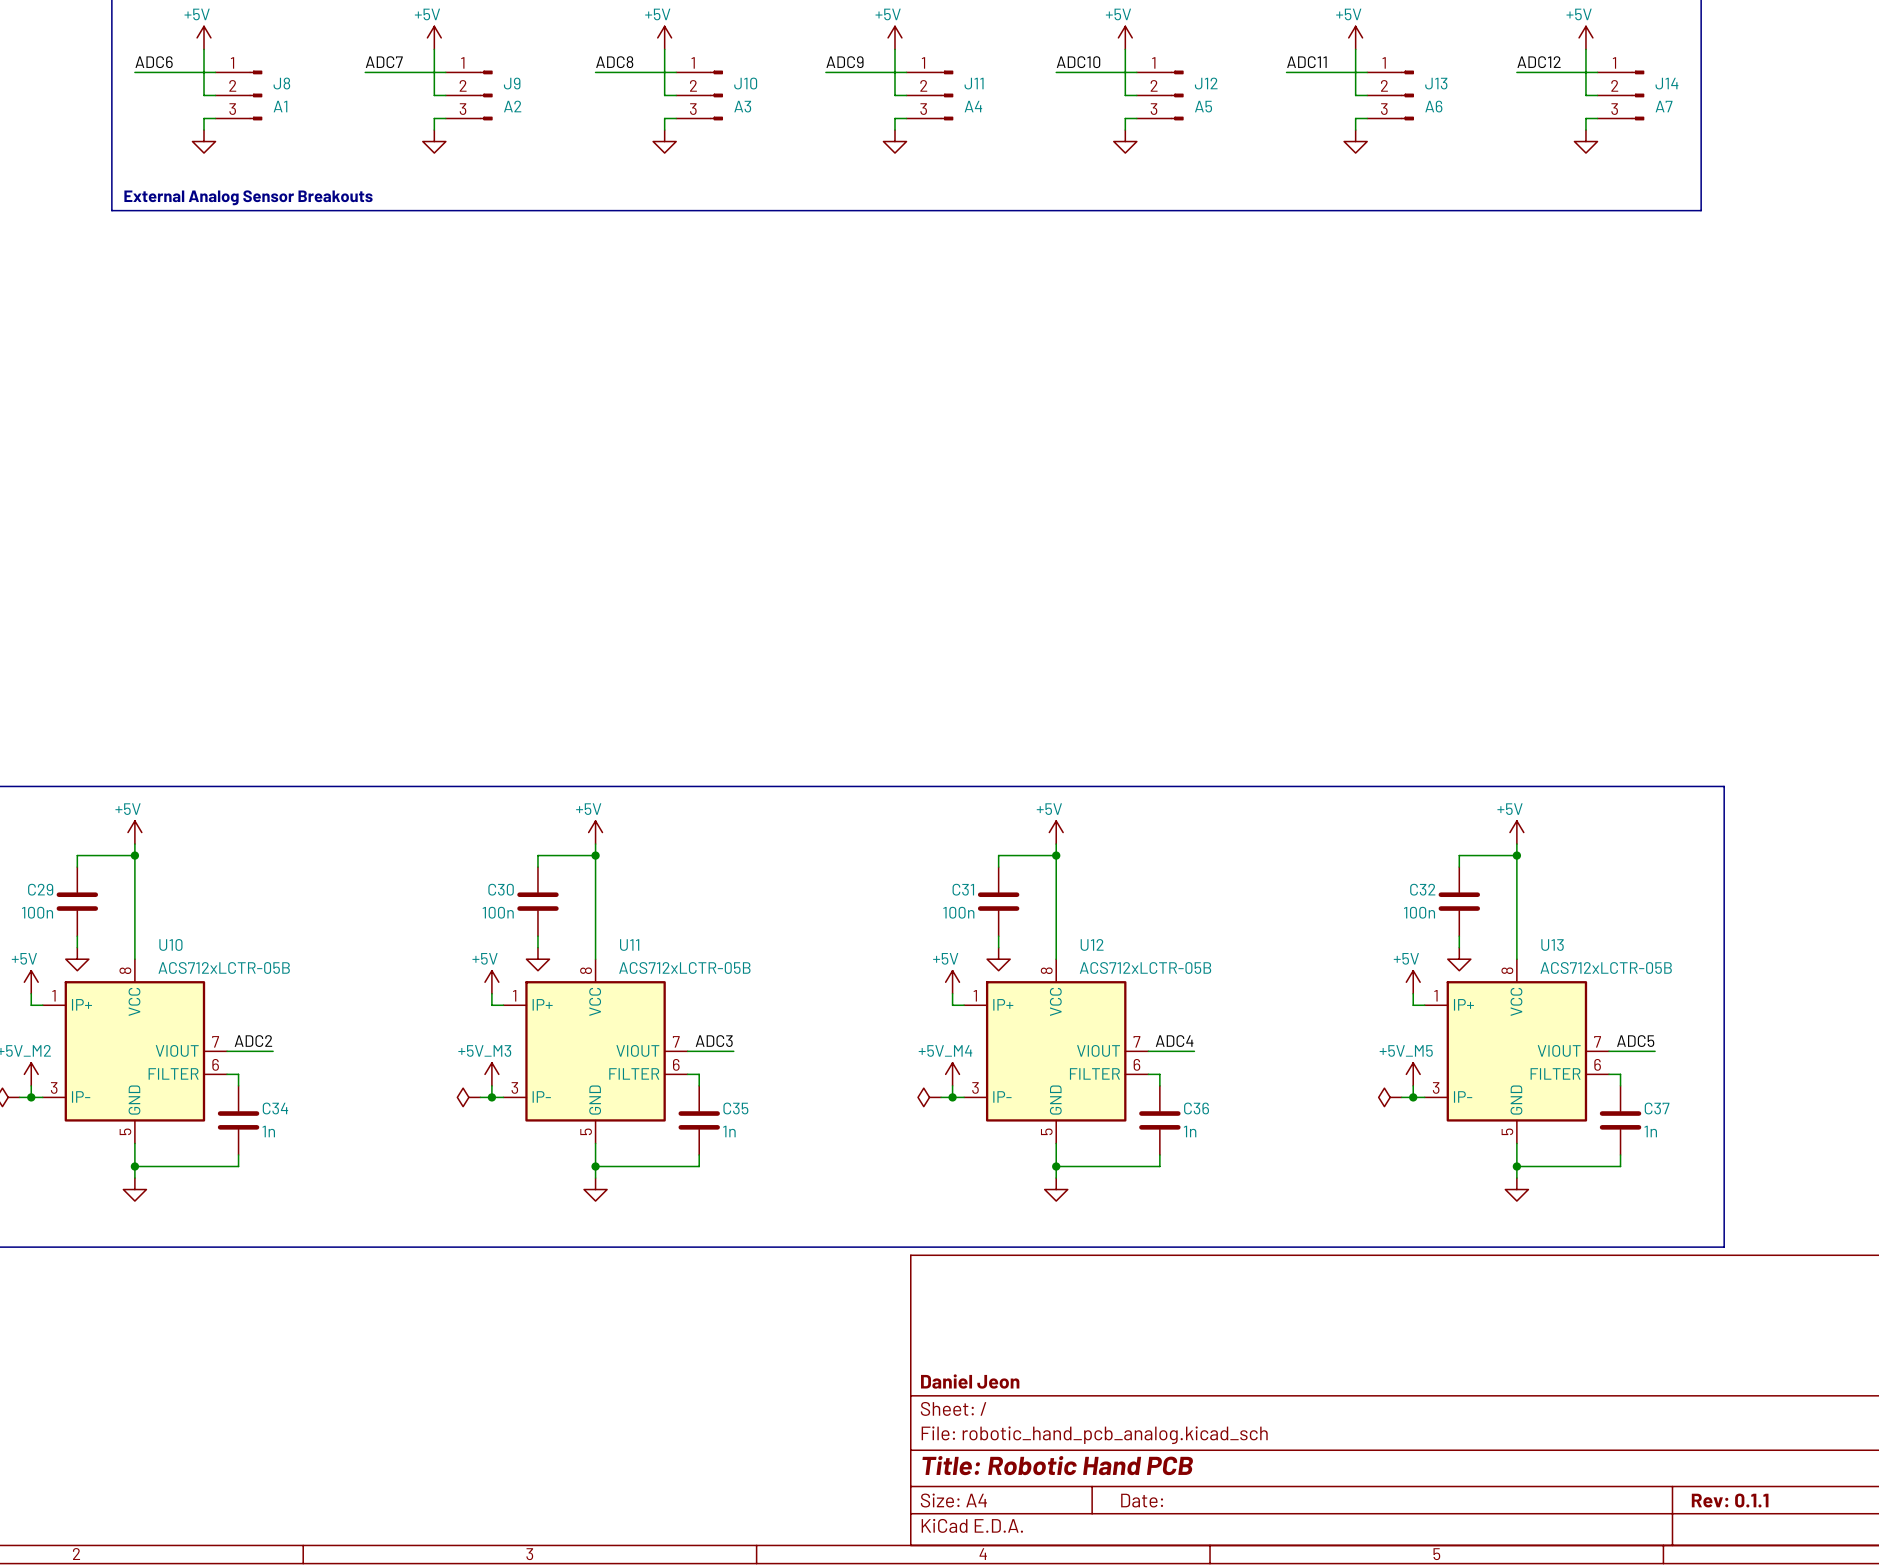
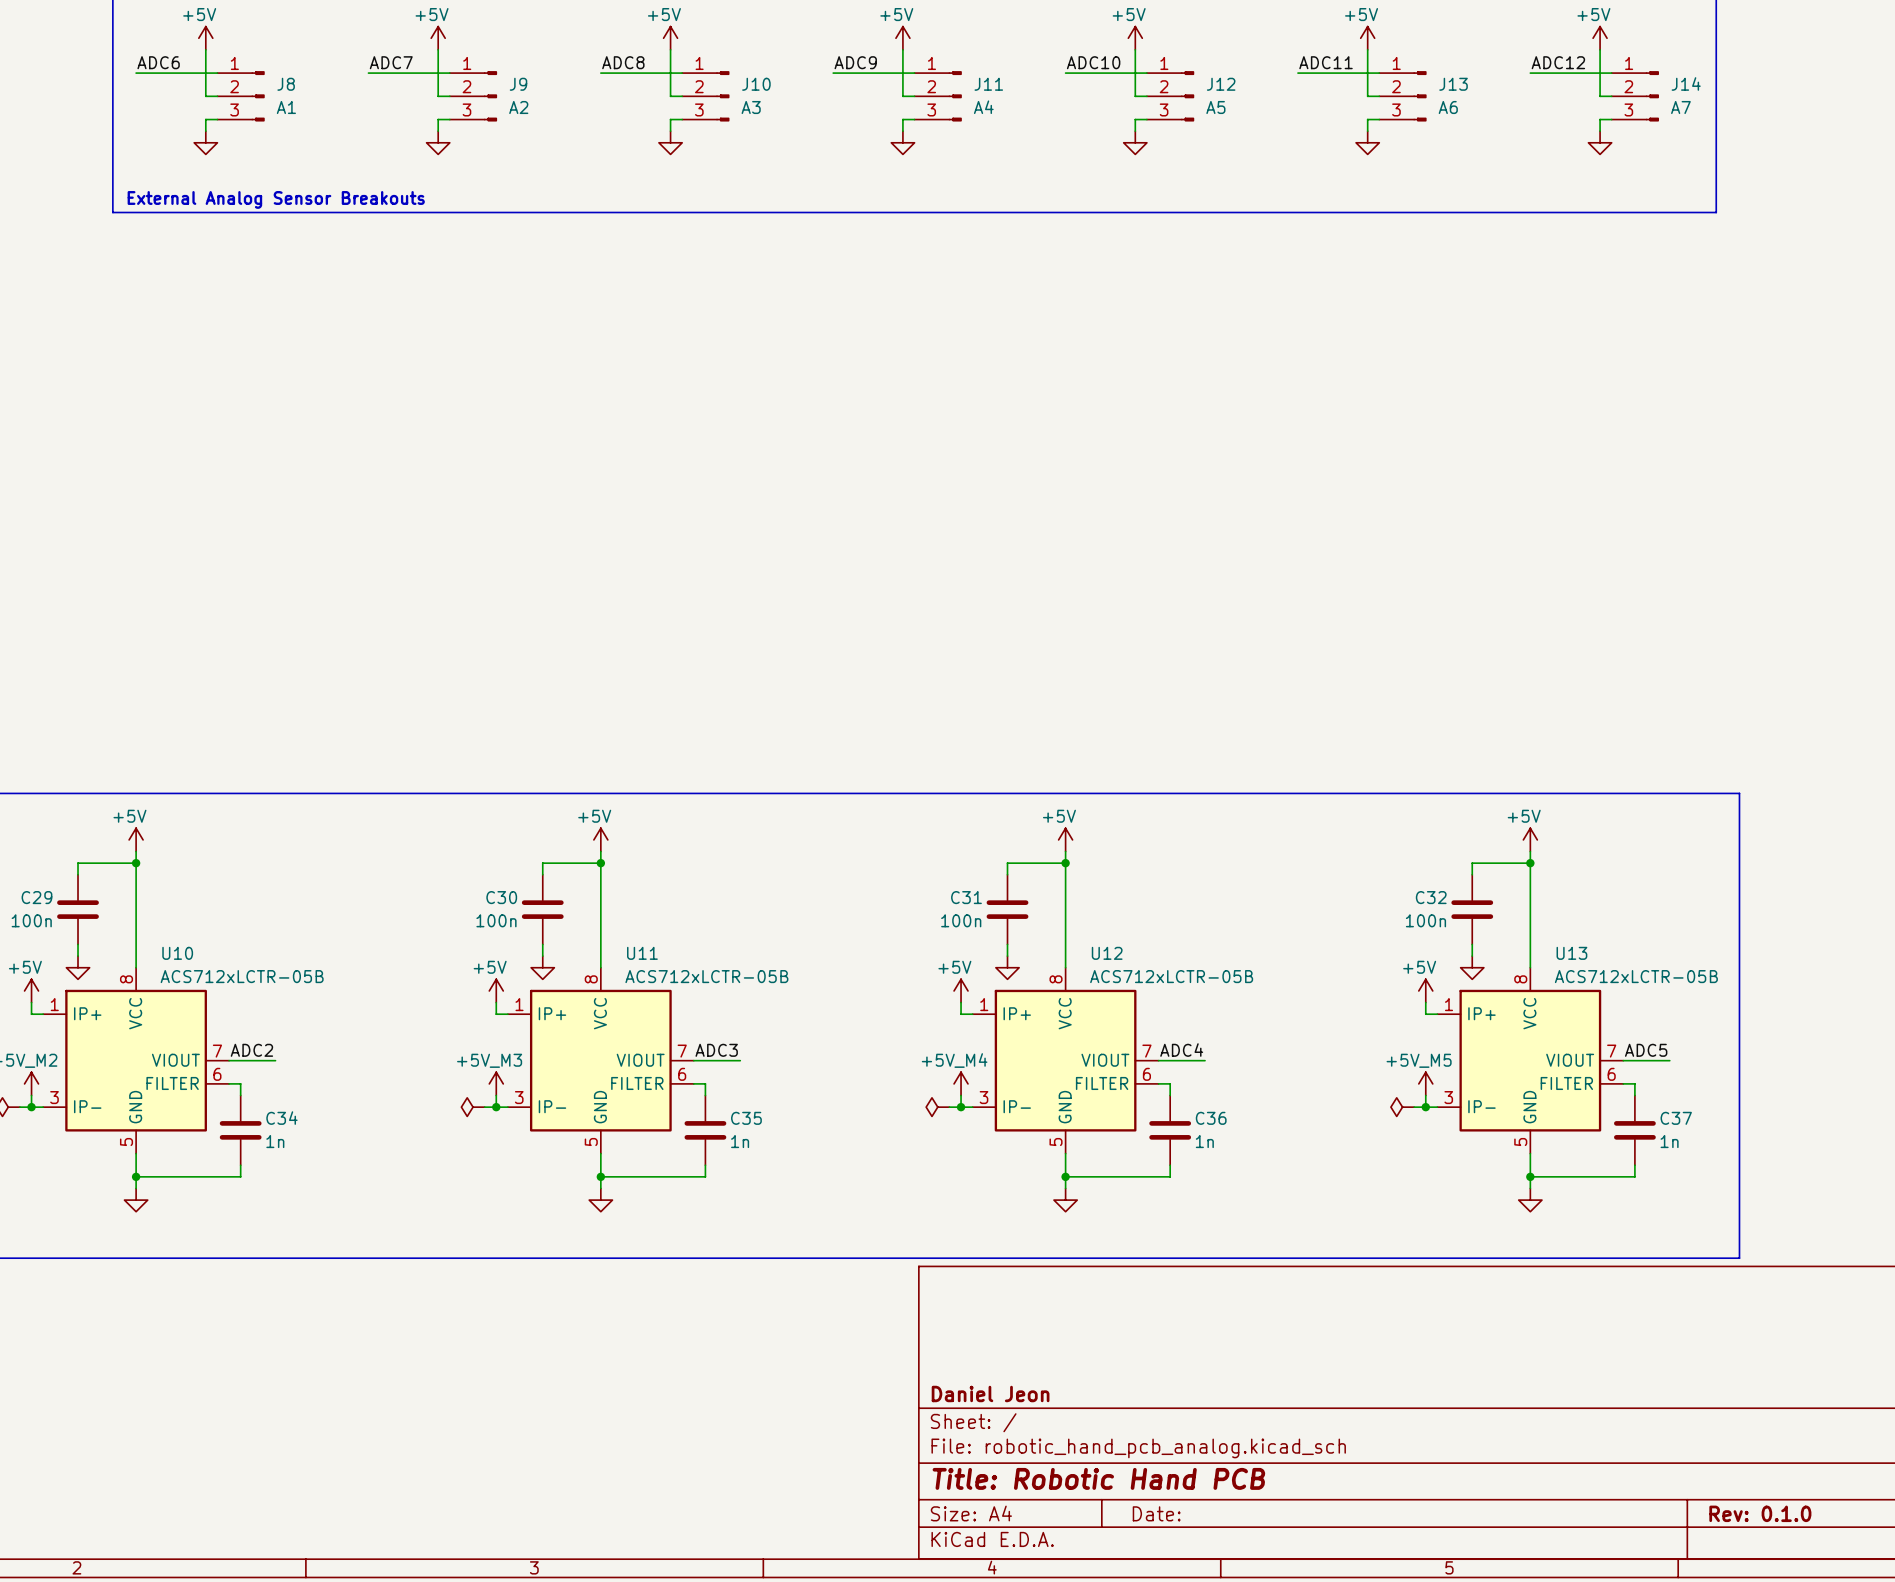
title block: Rev: 0.1.1 (1730, 1500) -> Rev: 0.1.0 (1760, 1513)

